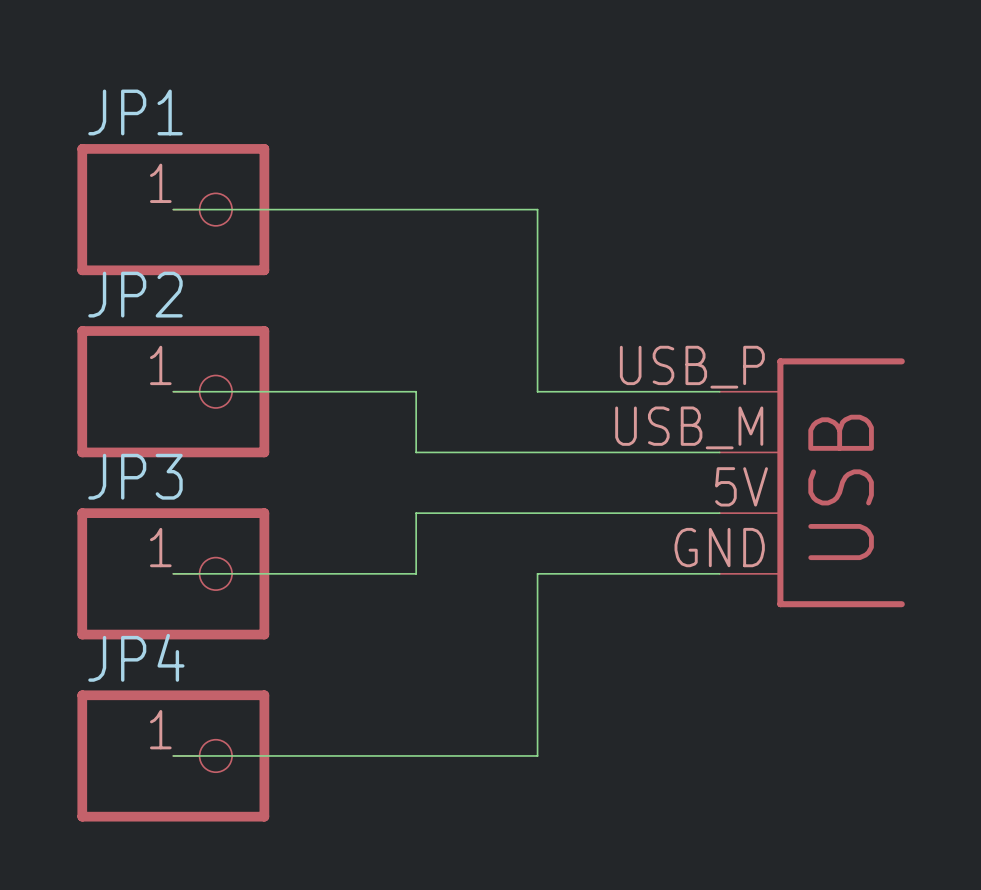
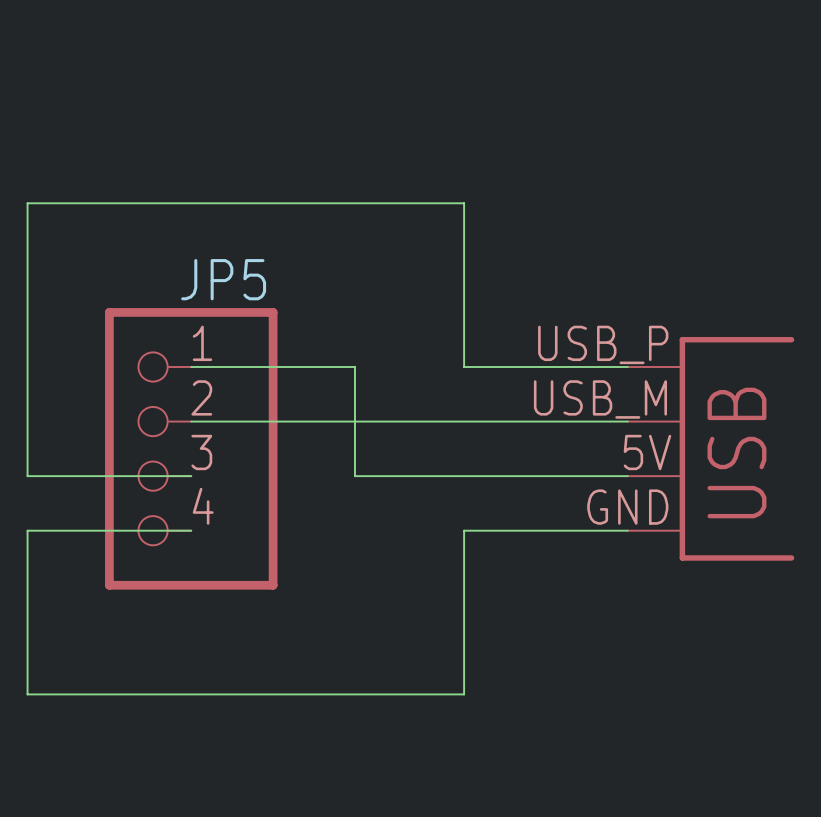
wire: none -> (136, 203) (27, 203) (27, 476) (191, 476)
JP1: (173, 209) -> none
wire: (173, 391) (234, 391) -> none
JP2: (173, 391) -> none
JP5: none -> (191, 448)
wire: (416, 513) (416, 573) (234, 573) -> (354, 476) (354, 421) (191, 421)
wire: none -> (136, 530) (27, 530) (27, 694) (136, 694)
JP3: (173, 573) -> none
JP4: (173, 755) -> none

